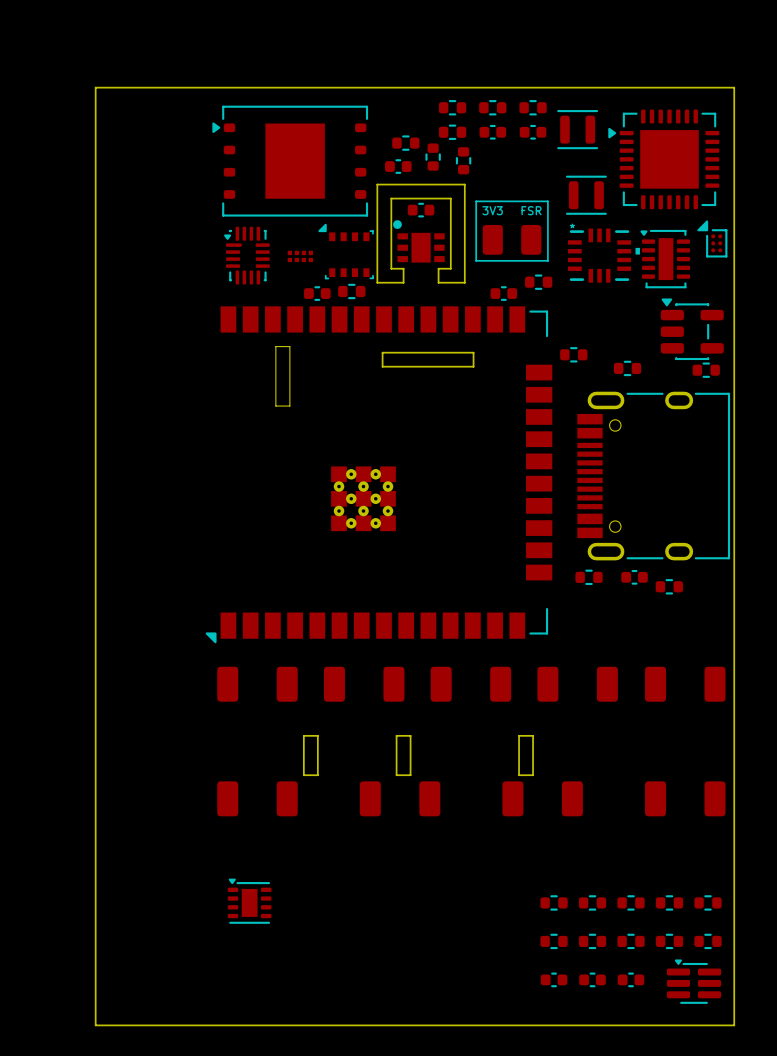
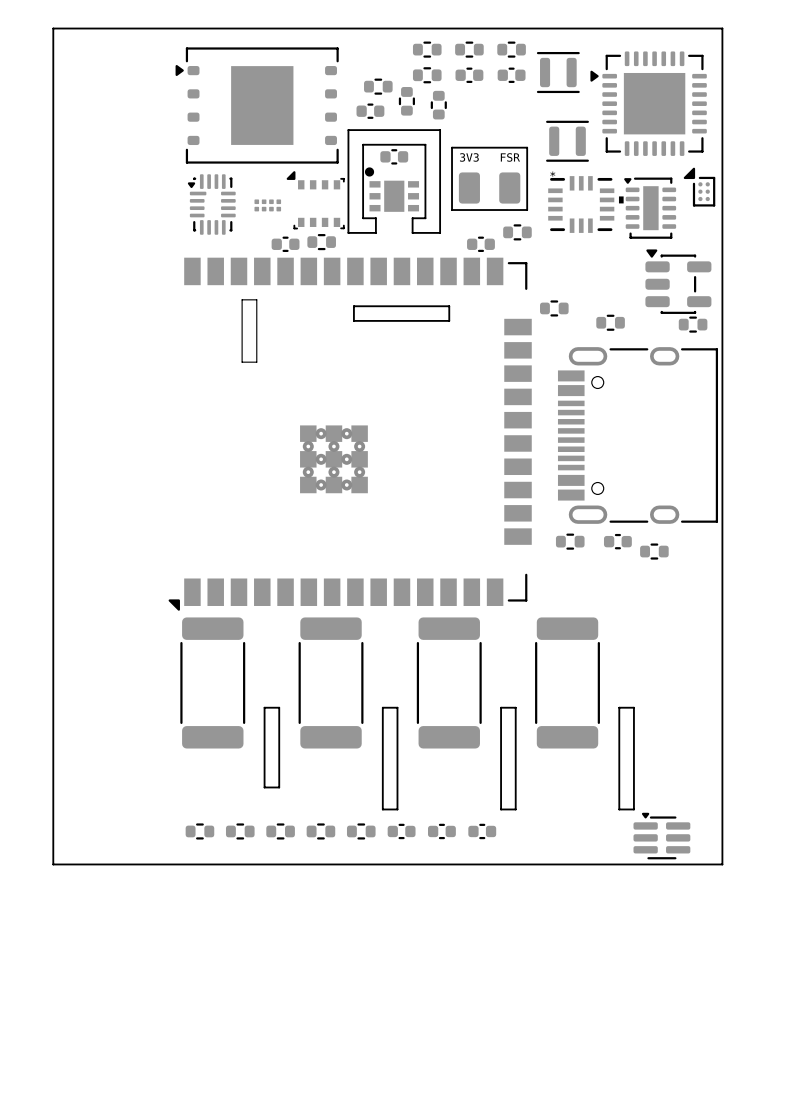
part: (257, 684) -> none
part: (364, 684) -> none
part: (470, 684) -> none
part: (577, 684) -> none
part: (685, 684) -> none
part: none -> (212, 682)
part: none -> (331, 682)
part: none -> (449, 682)
part: none -> (567, 682)
board edge: (303, 735) (303, 775) (317, 775) (317, 735) (311, 735) -> (271, 707) (264, 707) (264, 787) (279, 787) (279, 707)
board edge: (410, 735) (396, 735) (396, 775) (410, 775) (410, 735) -> (382, 707) (382, 809) (397, 809) (397, 707) (383, 707)
board edge: (522, 735) (519, 735) (519, 775) (533, 775) (533, 735) -> (501, 707) (501, 809) (515, 809) (515, 707) (511, 707)
board edge: none -> (619, 707) (633, 707) (633, 809) (619, 809) (619, 707)
part: (257, 798) -> none
part: (400, 798) -> none
part: (542, 798) -> none
part: (685, 798) -> none
part: none -> (199, 831)
part: none -> (240, 831)
part: none -> (280, 831)
part: none -> (320, 831)
part: none -> (361, 831)
part: none -> (401, 831)
part: none -> (441, 831)
part: none -> (482, 831)
board edge: (95, 885) (95, 1025) (734, 1025) (734, 885) -> (53, 864) (722, 864)
part: (249, 901) -> none
part: (554, 902) -> none
part: (592, 902) -> none
part: (631, 902) -> none
part: (669, 902) -> none
part: (708, 902) -> none
part: (554, 941) -> none
part: (592, 941) -> none
part: (631, 941) -> none
part: (669, 941) -> none
part: (708, 941) -> none
part: (554, 979) -> none
part: (592, 979) -> none
part: (631, 979) -> none
part position: (694, 981) -> (661, 836)

